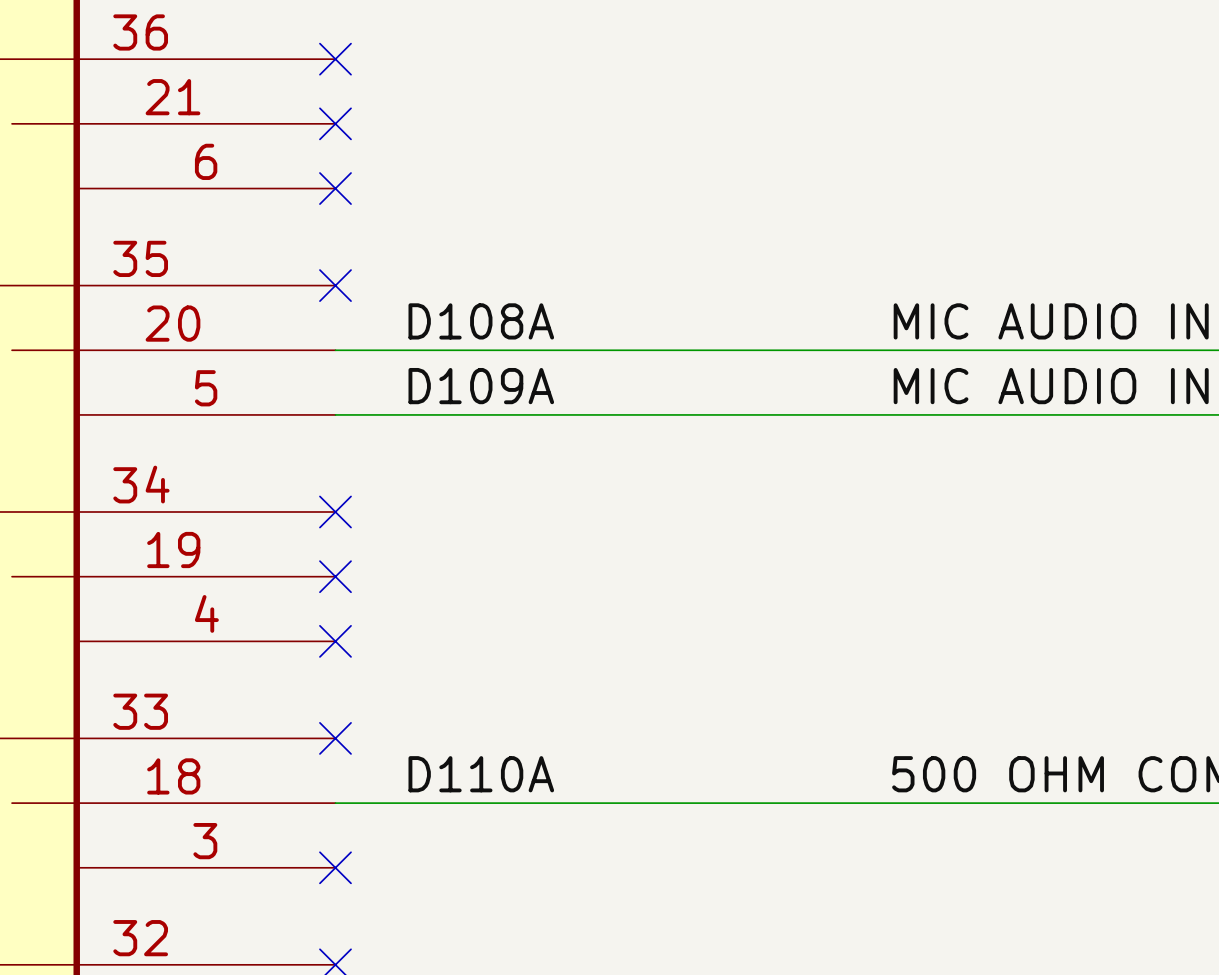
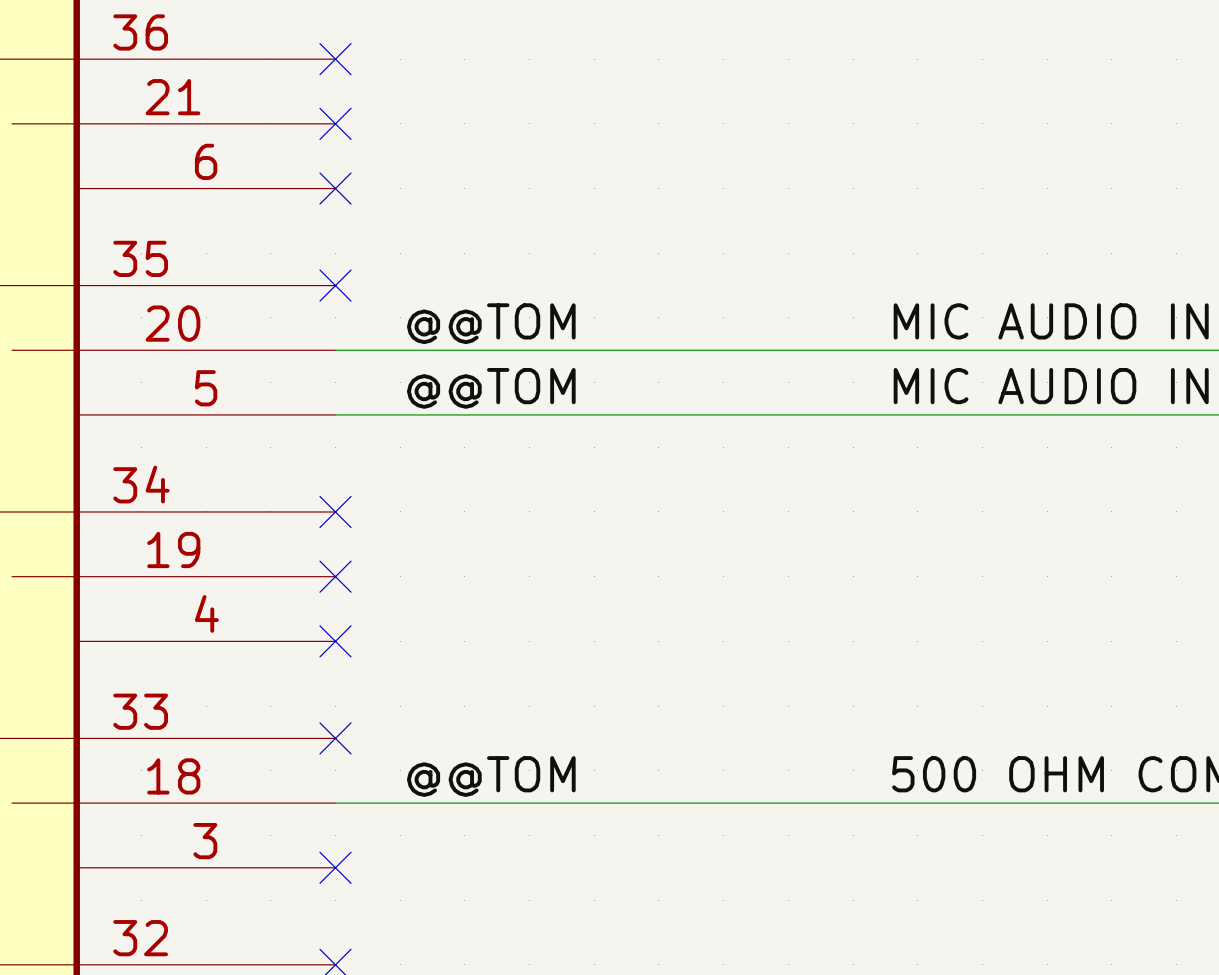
label: D108A (481, 321) -> @@TOM (491, 323)
label: D109A (481, 386) -> @@TOM (491, 388)
label: D110A (481, 774) -> @@TOM (491, 776)

